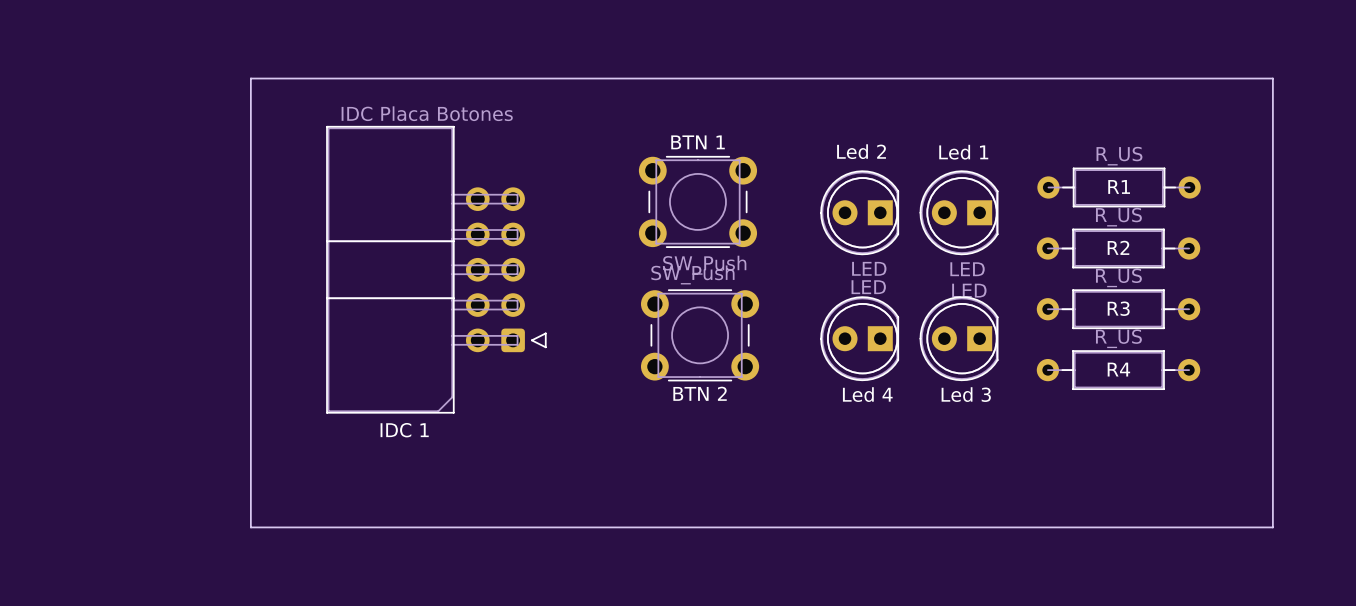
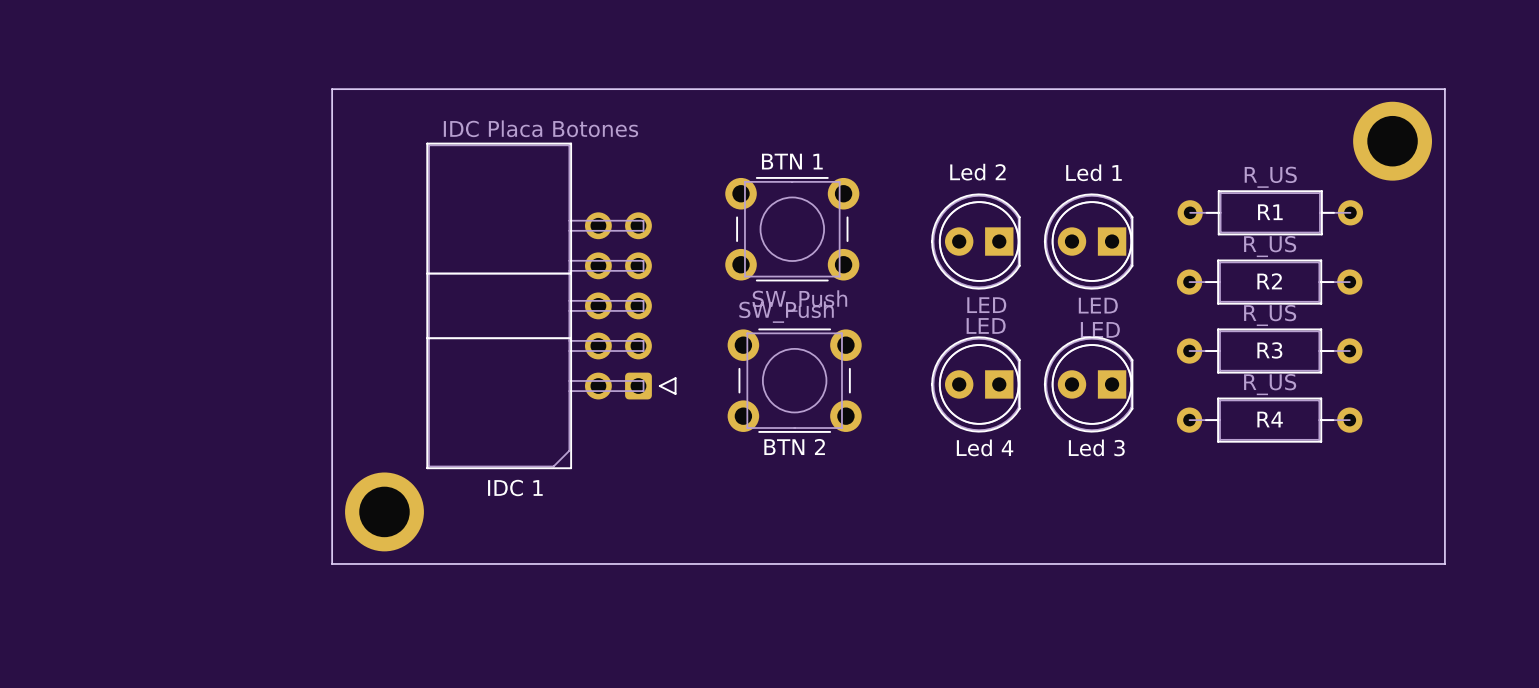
board edge: (292, 78) (250, 78) (250, 527) (1272, 527) (1272, 496) -> (332, 89) (332, 563) (1444, 563)
part: none -> (1392, 141)
IDC 1 position: (436, 269) -> (551, 305)
part: none -> (384, 511)

